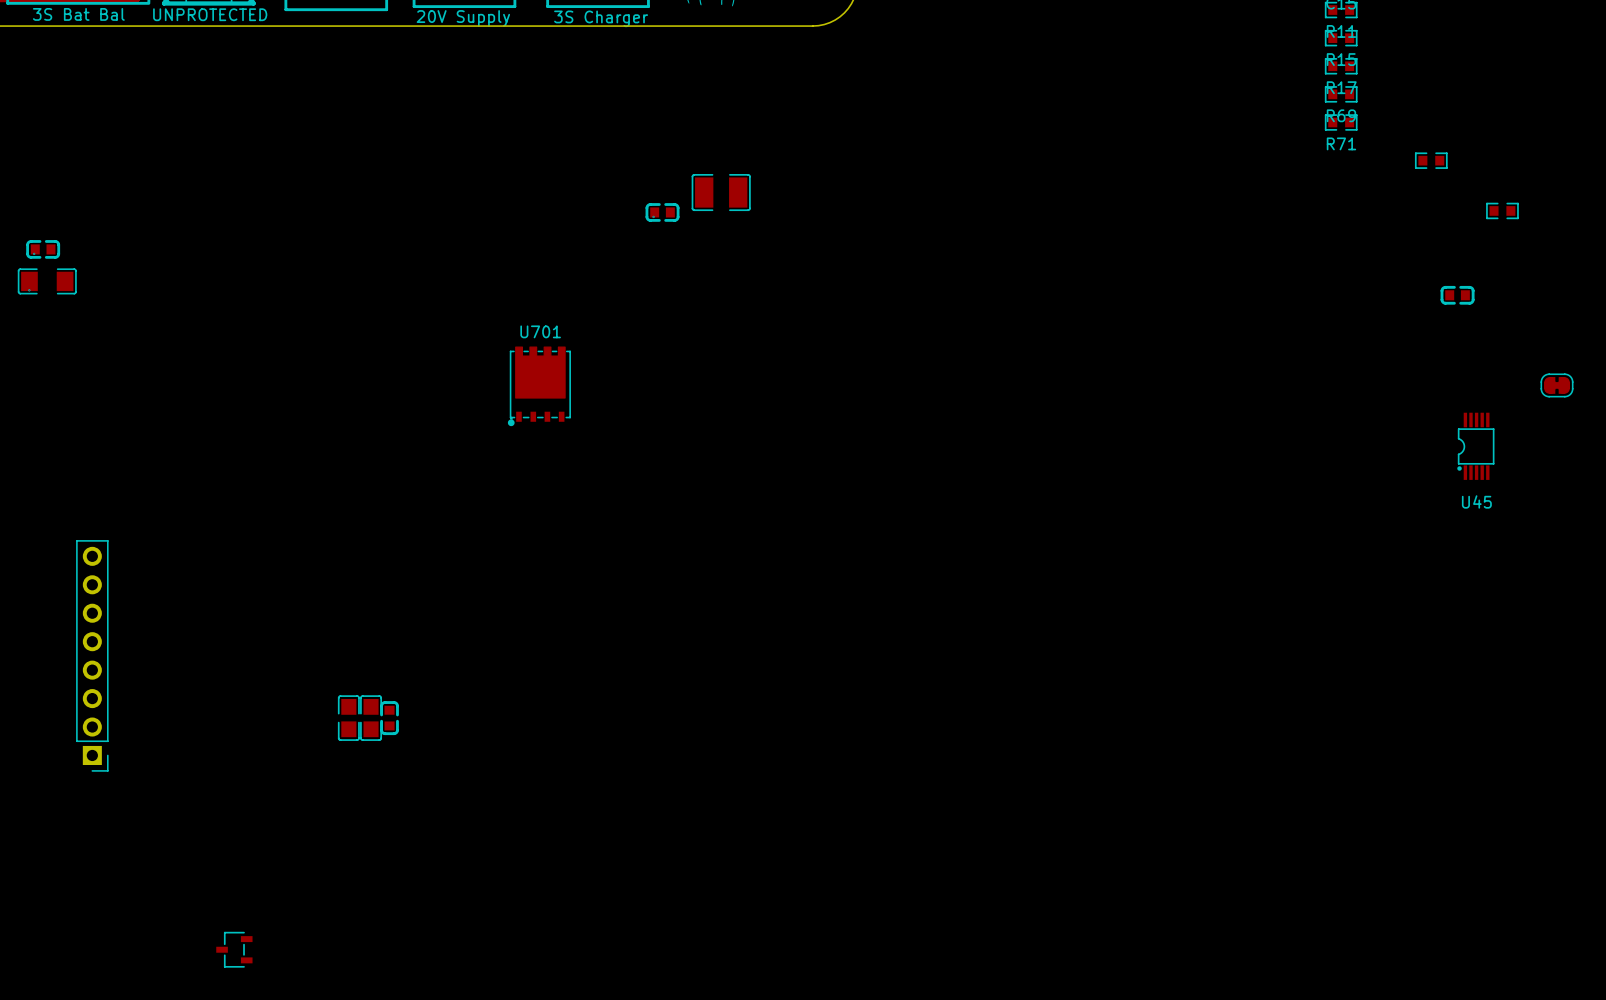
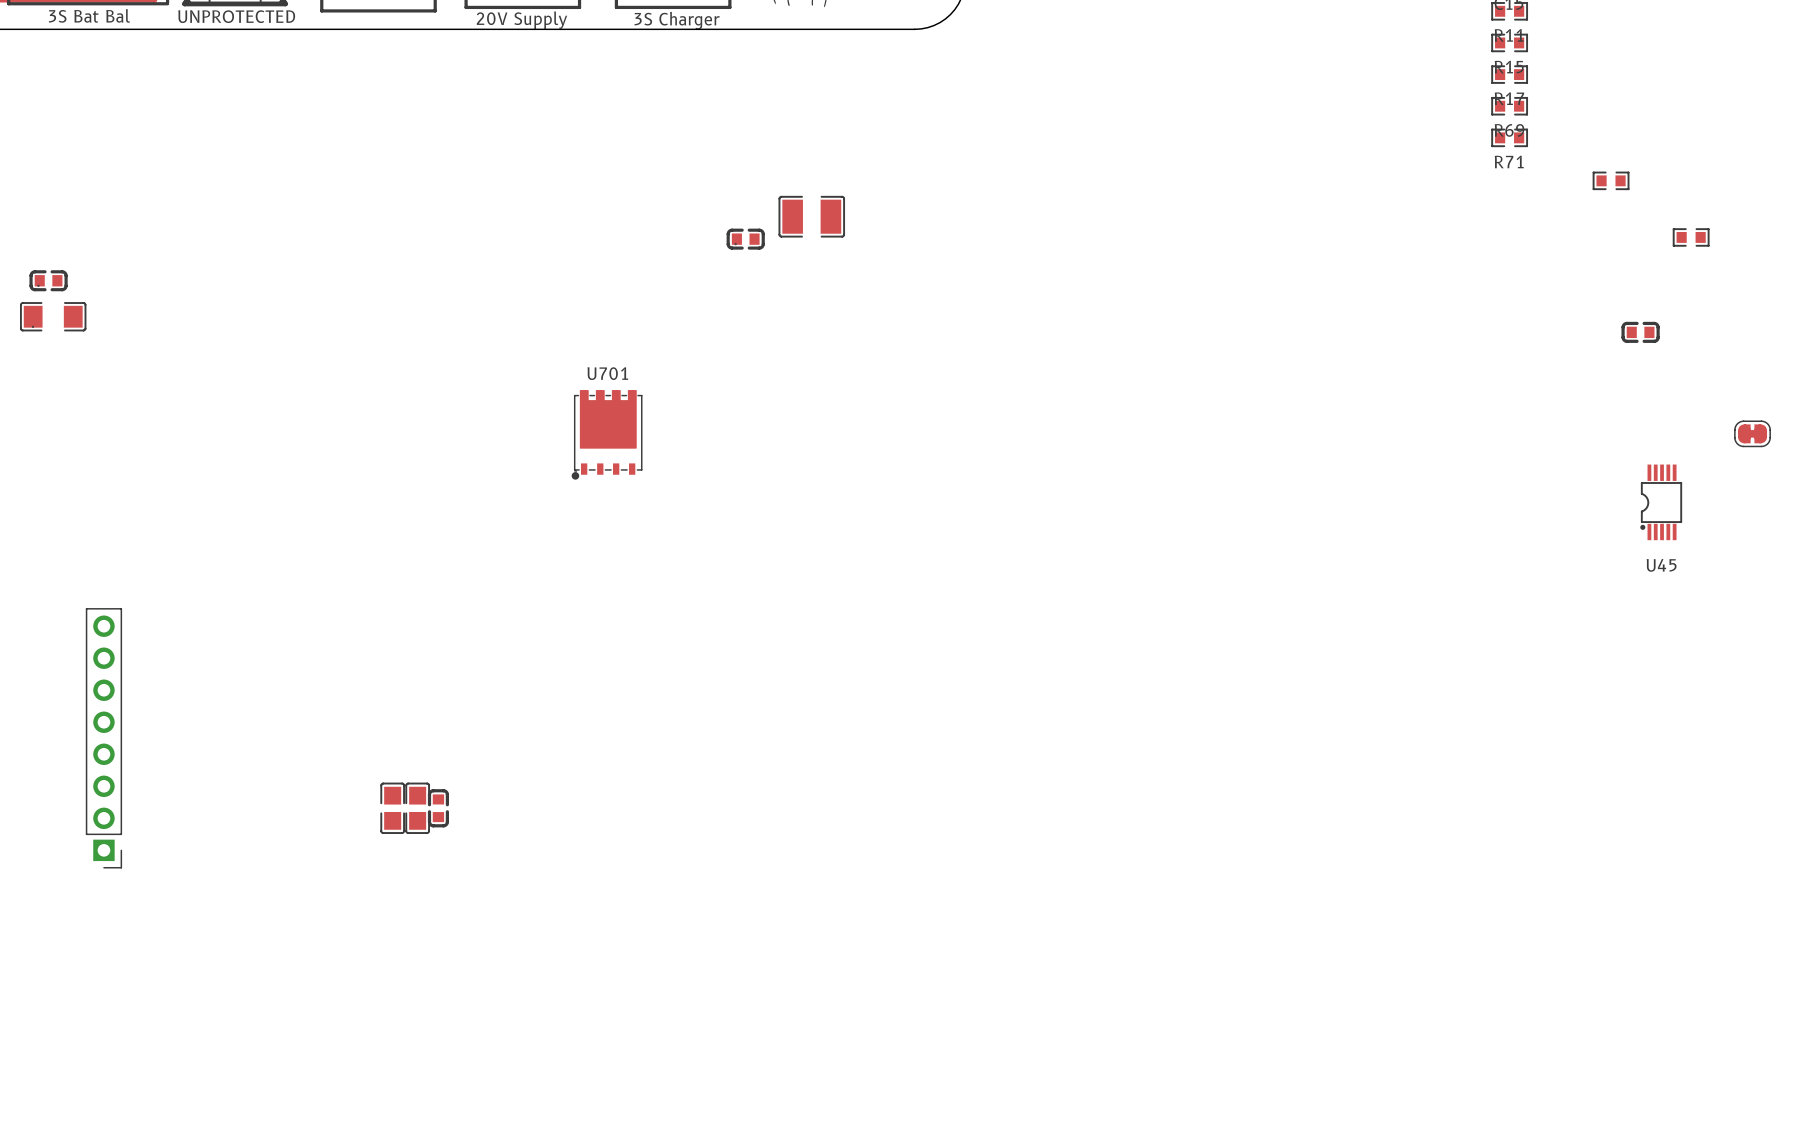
part: (234, 949) -> none

